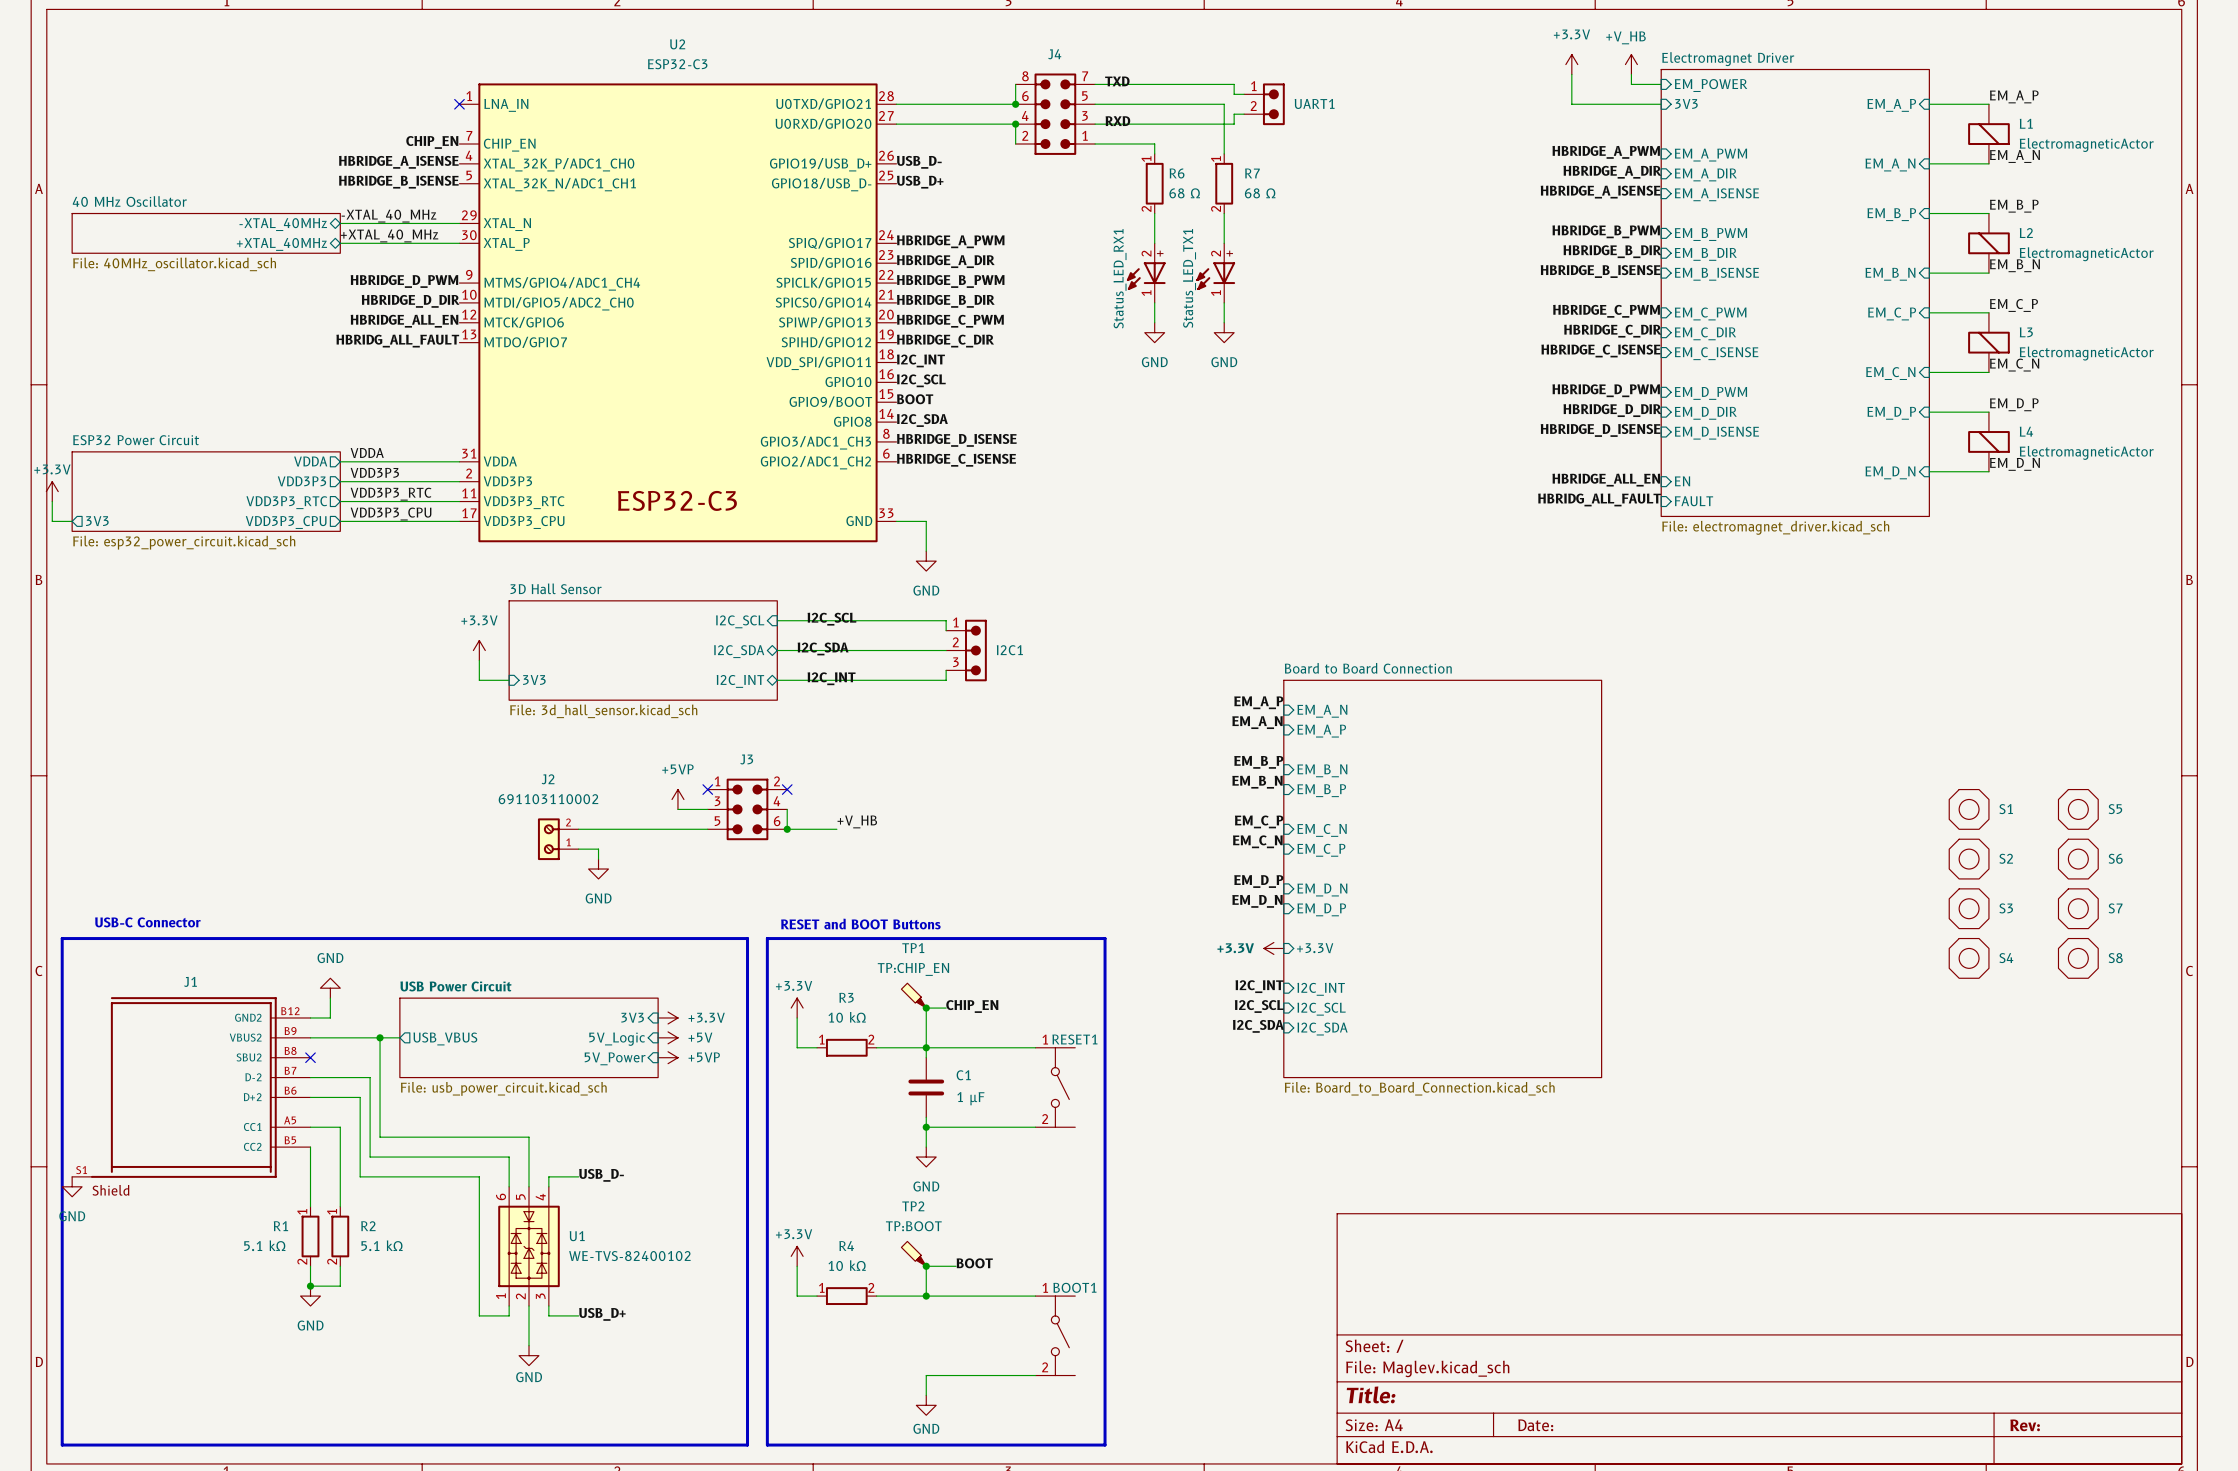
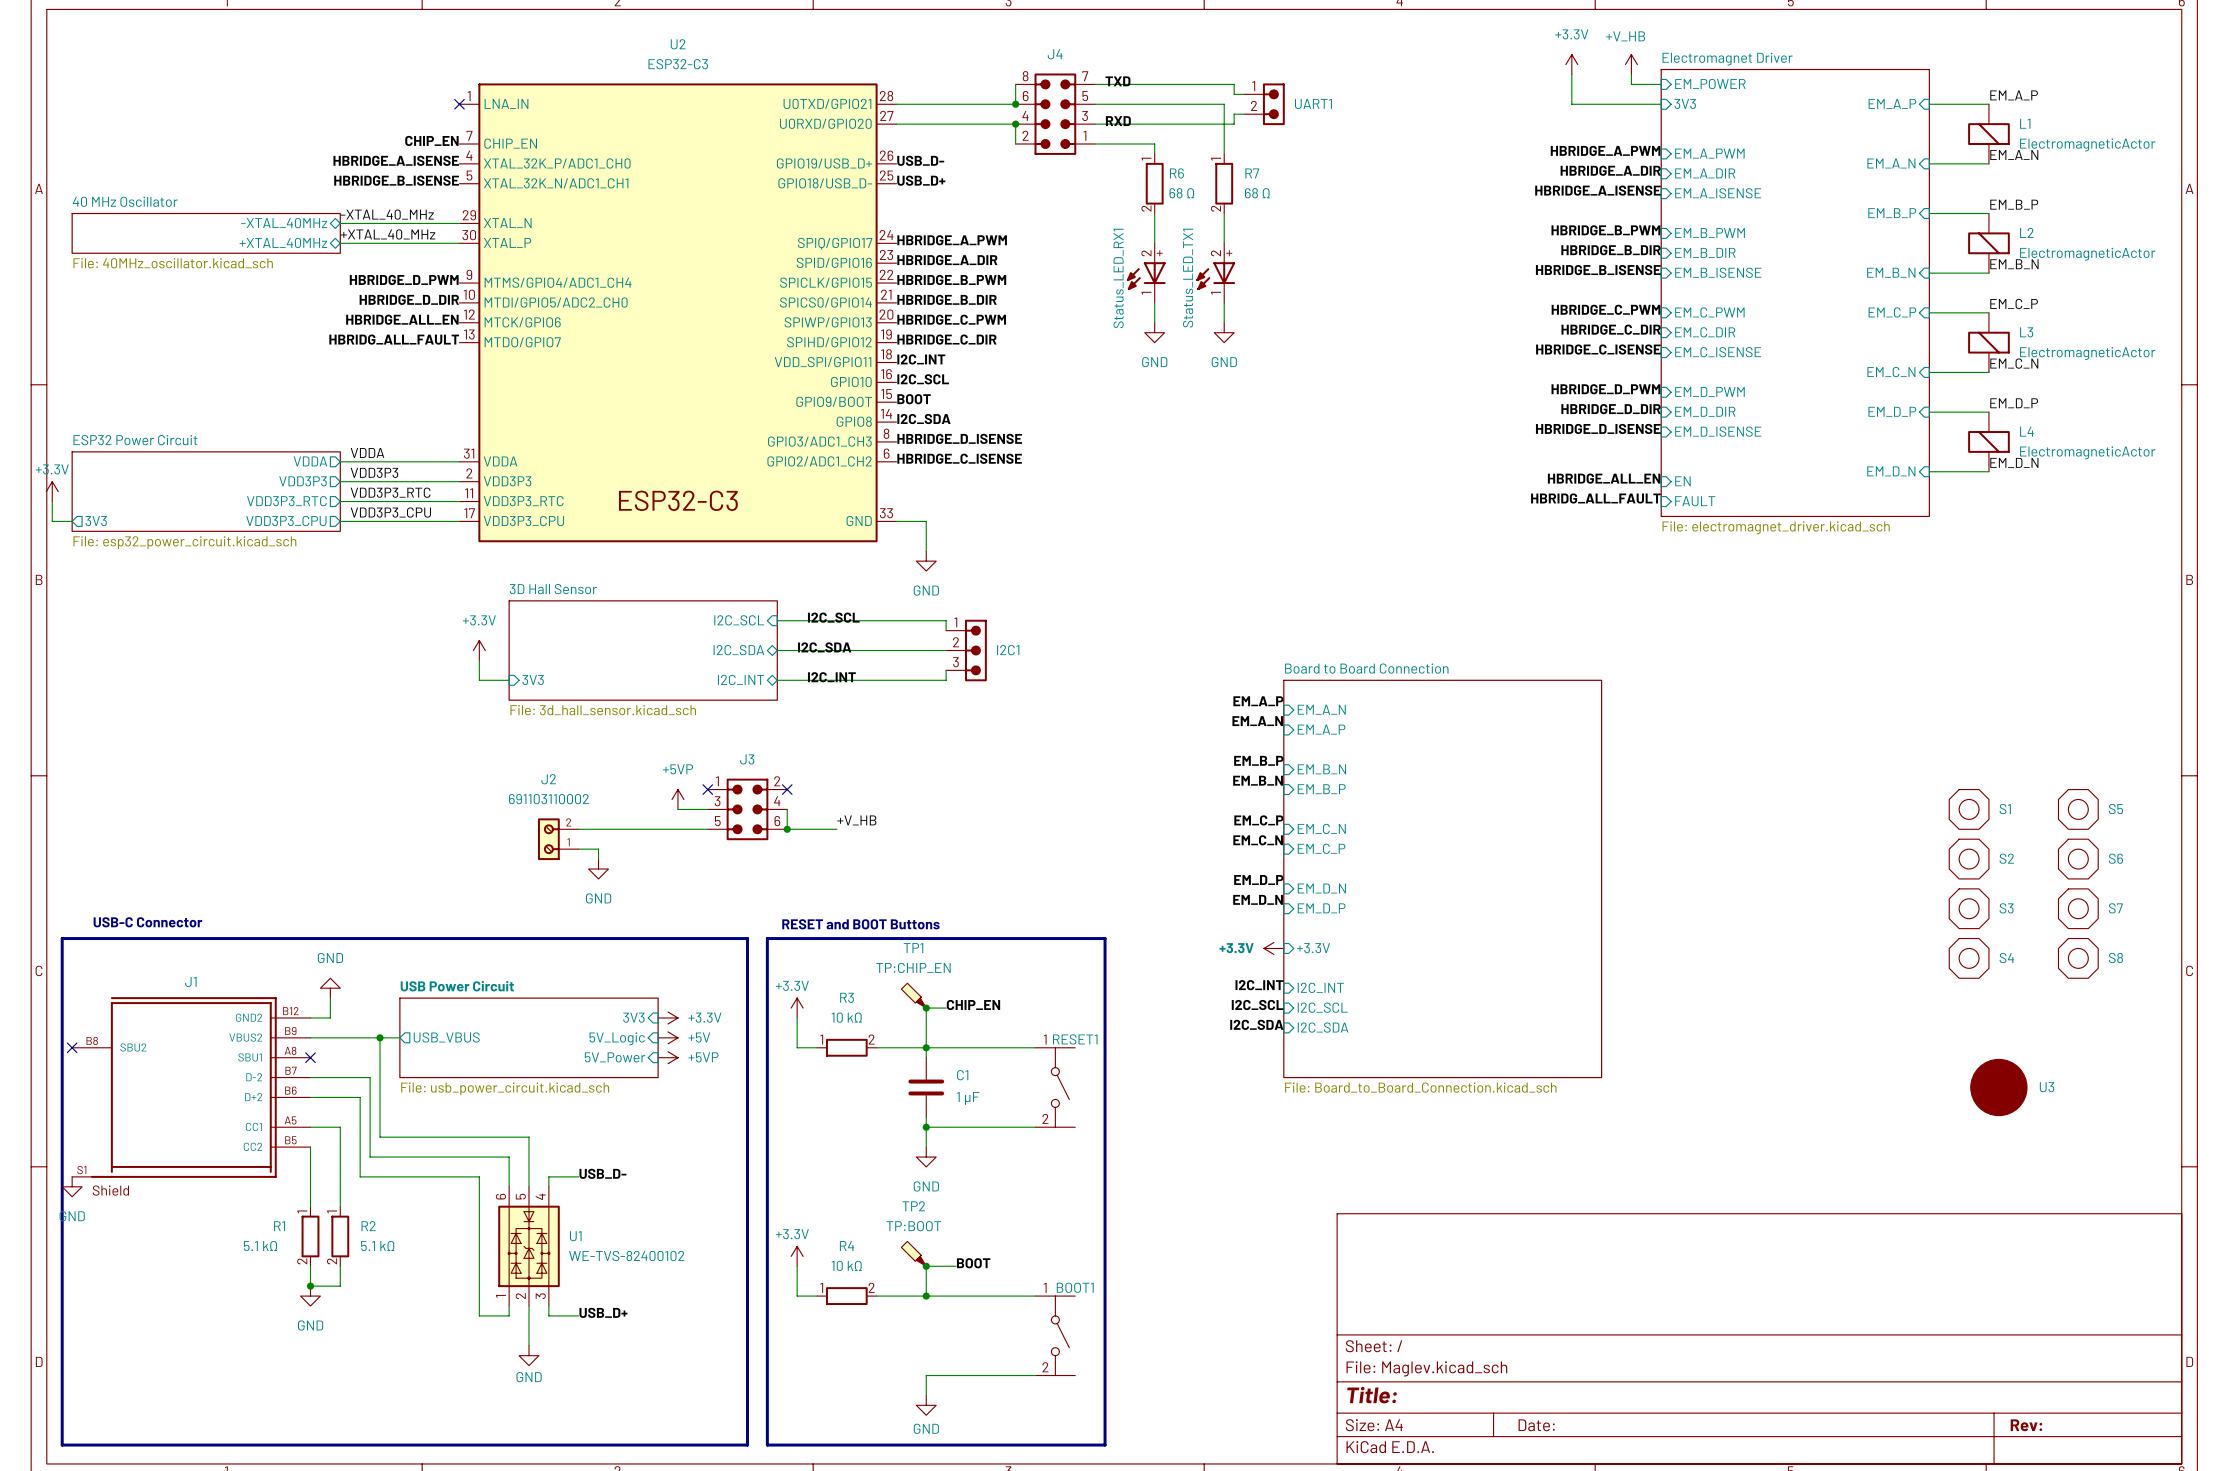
J1 symbol: [72, 997, 311, 1178] -> [72, 997, 311, 1178]
no-connect mark: none -> (72, 1047)
U3: none -> (1998, 1087)

